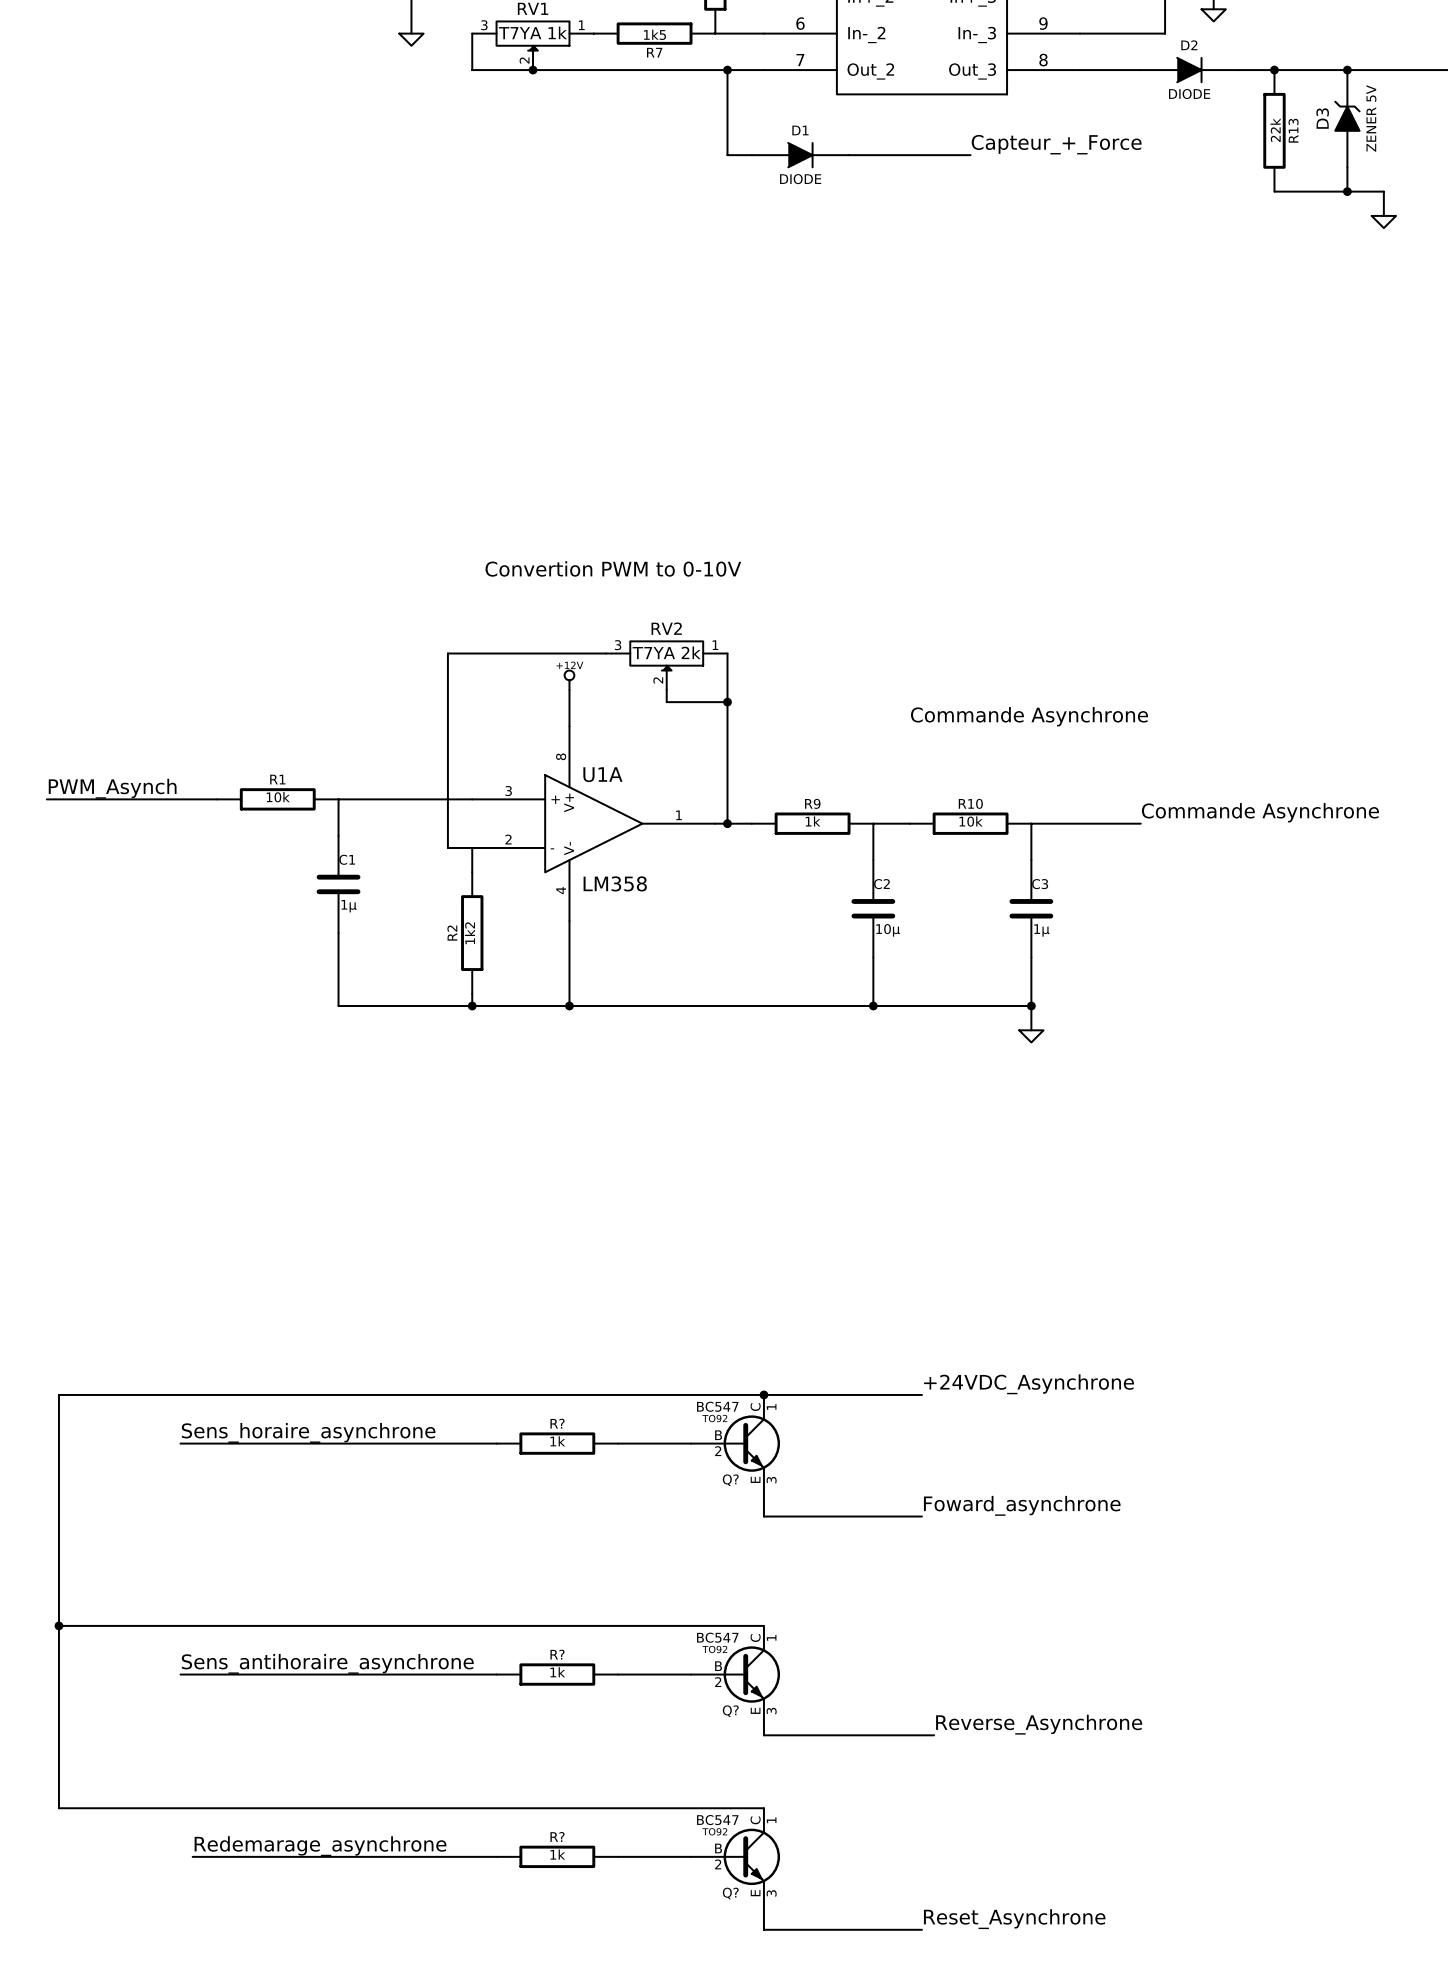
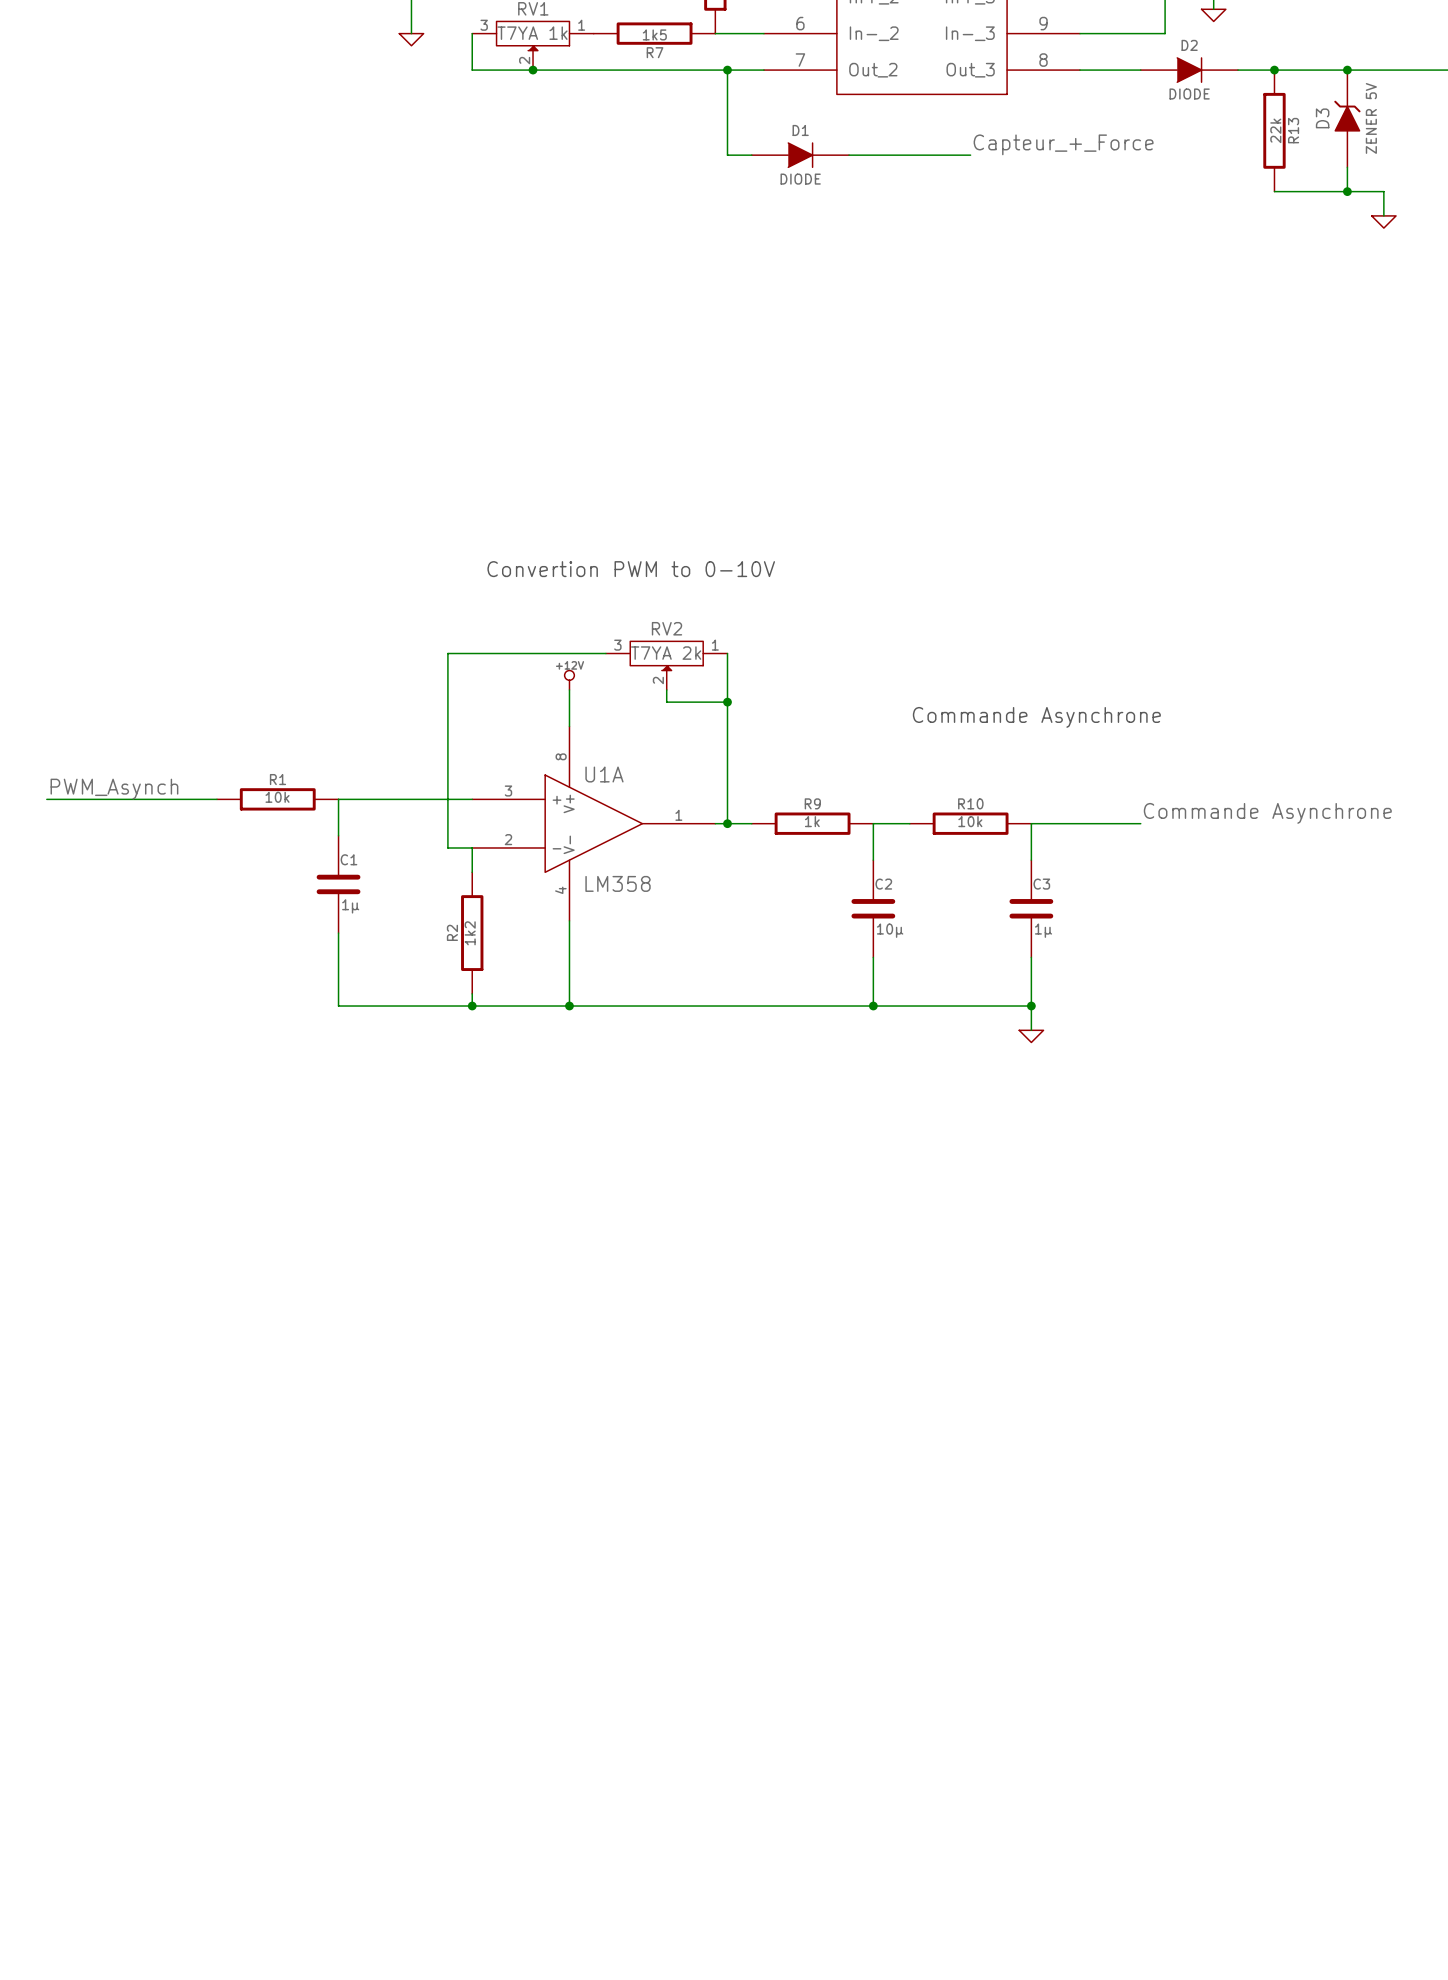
label: +24VDC_Asynchrone (1029, 1384) -> none
junction: (763, 1394) -> none
wire: (921, 1394) (58, 1394) (58, 1808) (763, 1808) -> none
label: Sens_horaire_asynchrone (308, 1432) -> none
wire: (180, 1443) (496, 1443) -> none
R?: 1k (557, 1443) -> none
wire: (618, 1443) (691, 1443) -> none
Q?: BC547 (735, 1443) -> none
wire: (763, 1492) (763, 1516) (921, 1516) -> none
label: Foward_asynchrone (1022, 1505) -> none
wire: (58, 1625) (763, 1625) -> none
junction: (58, 1625) -> none
label: Sens_antihoraire_asynchrone (327, 1663) -> none
wire: (180, 1674) (496, 1674) -> none
R?: 1k (557, 1674) -> none
wire: (618, 1674) (691, 1674) -> none
Q?: BC547 (735, 1674) -> none
wire: (763, 1723) (763, 1735) (934, 1735) -> none
label: Reverse_Asynchrone (1039, 1724) -> none
label: Redemarage_asynchrone (320, 1846) -> none
wire: (192, 1856) (496, 1856) -> none
R?: 1k (557, 1856) -> none
wire: (618, 1856) (691, 1856) -> none
Q?: BC547 (735, 1856) -> none
wire: (763, 1905) (763, 1929) (921, 1929) -> none
label: Reset_Asynchrone (1014, 1919) -> none

